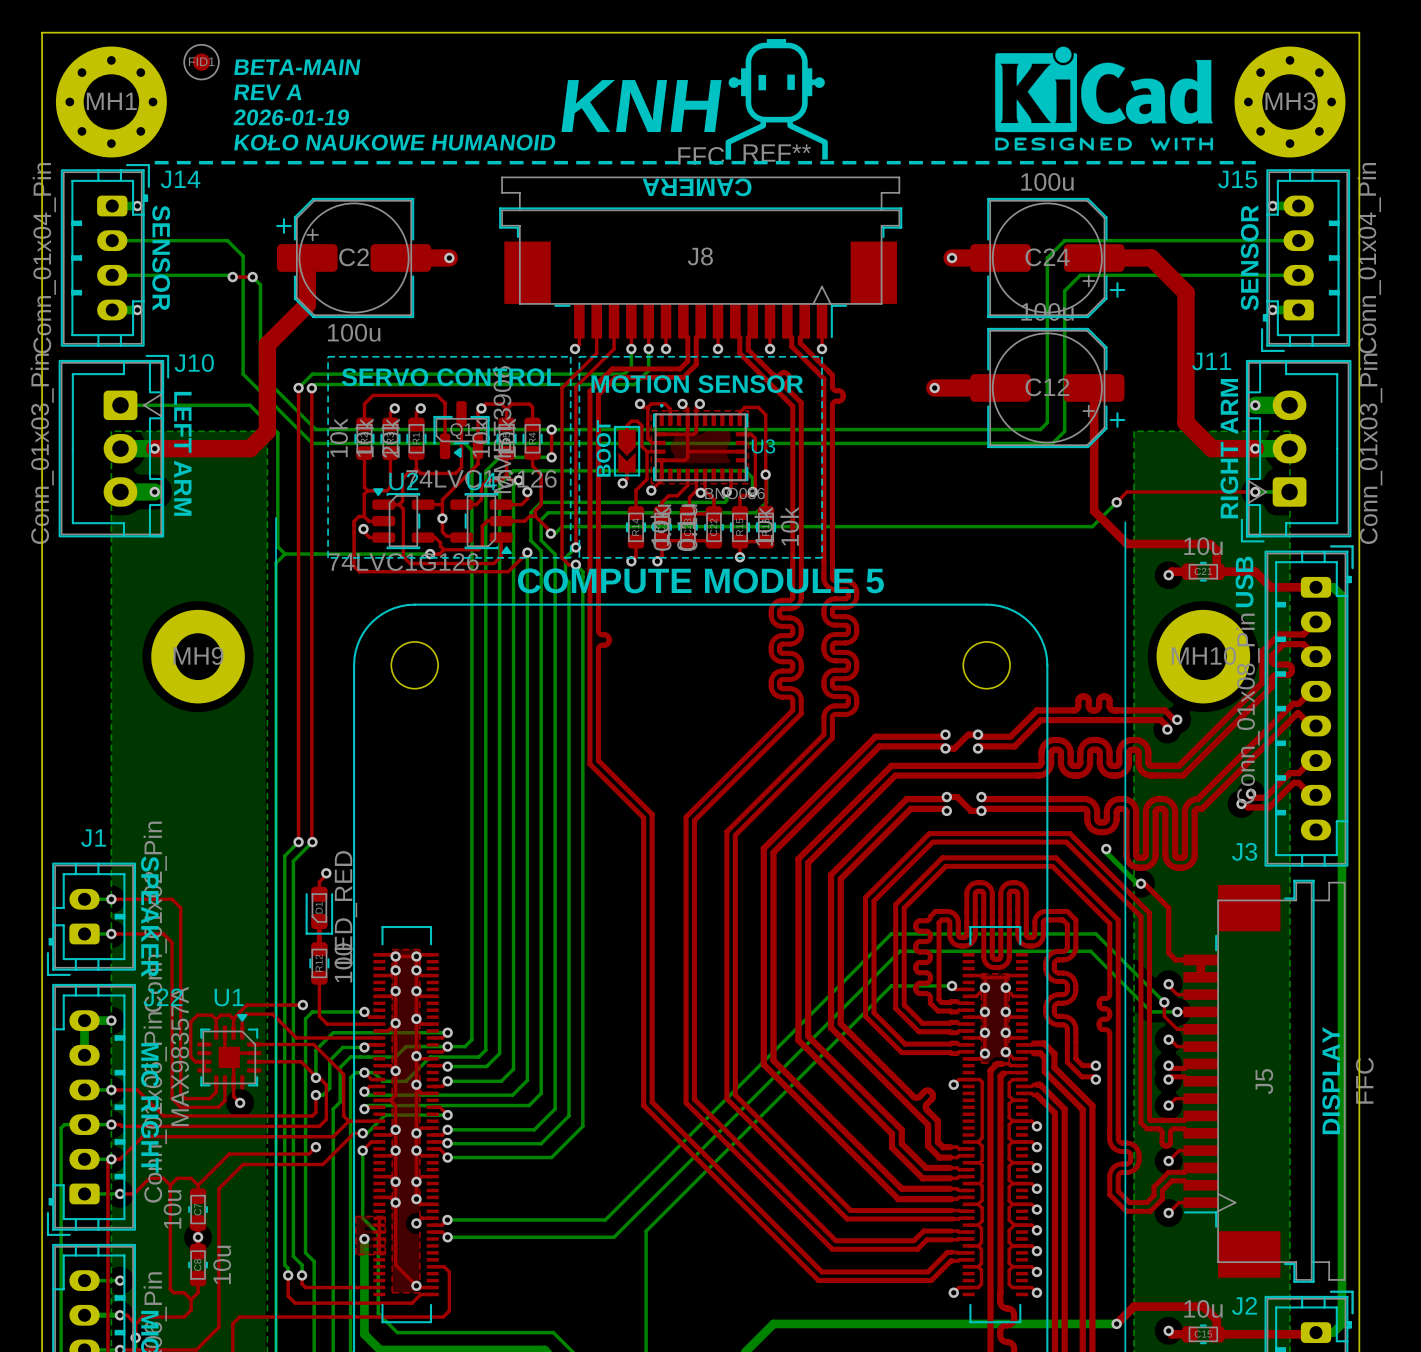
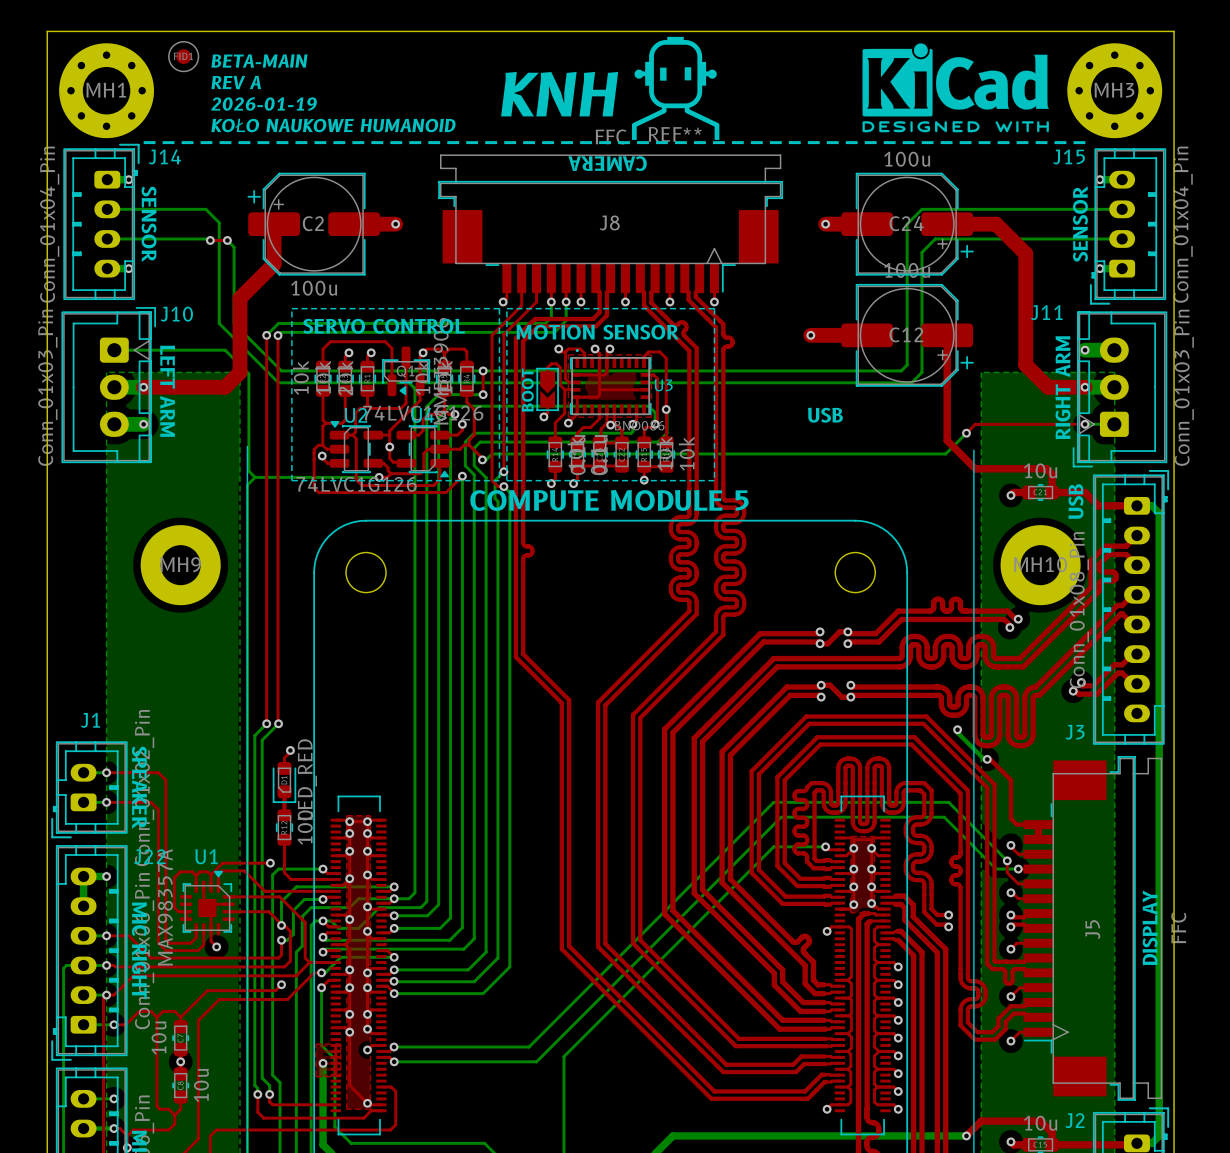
text: none -> USB (825, 415)

